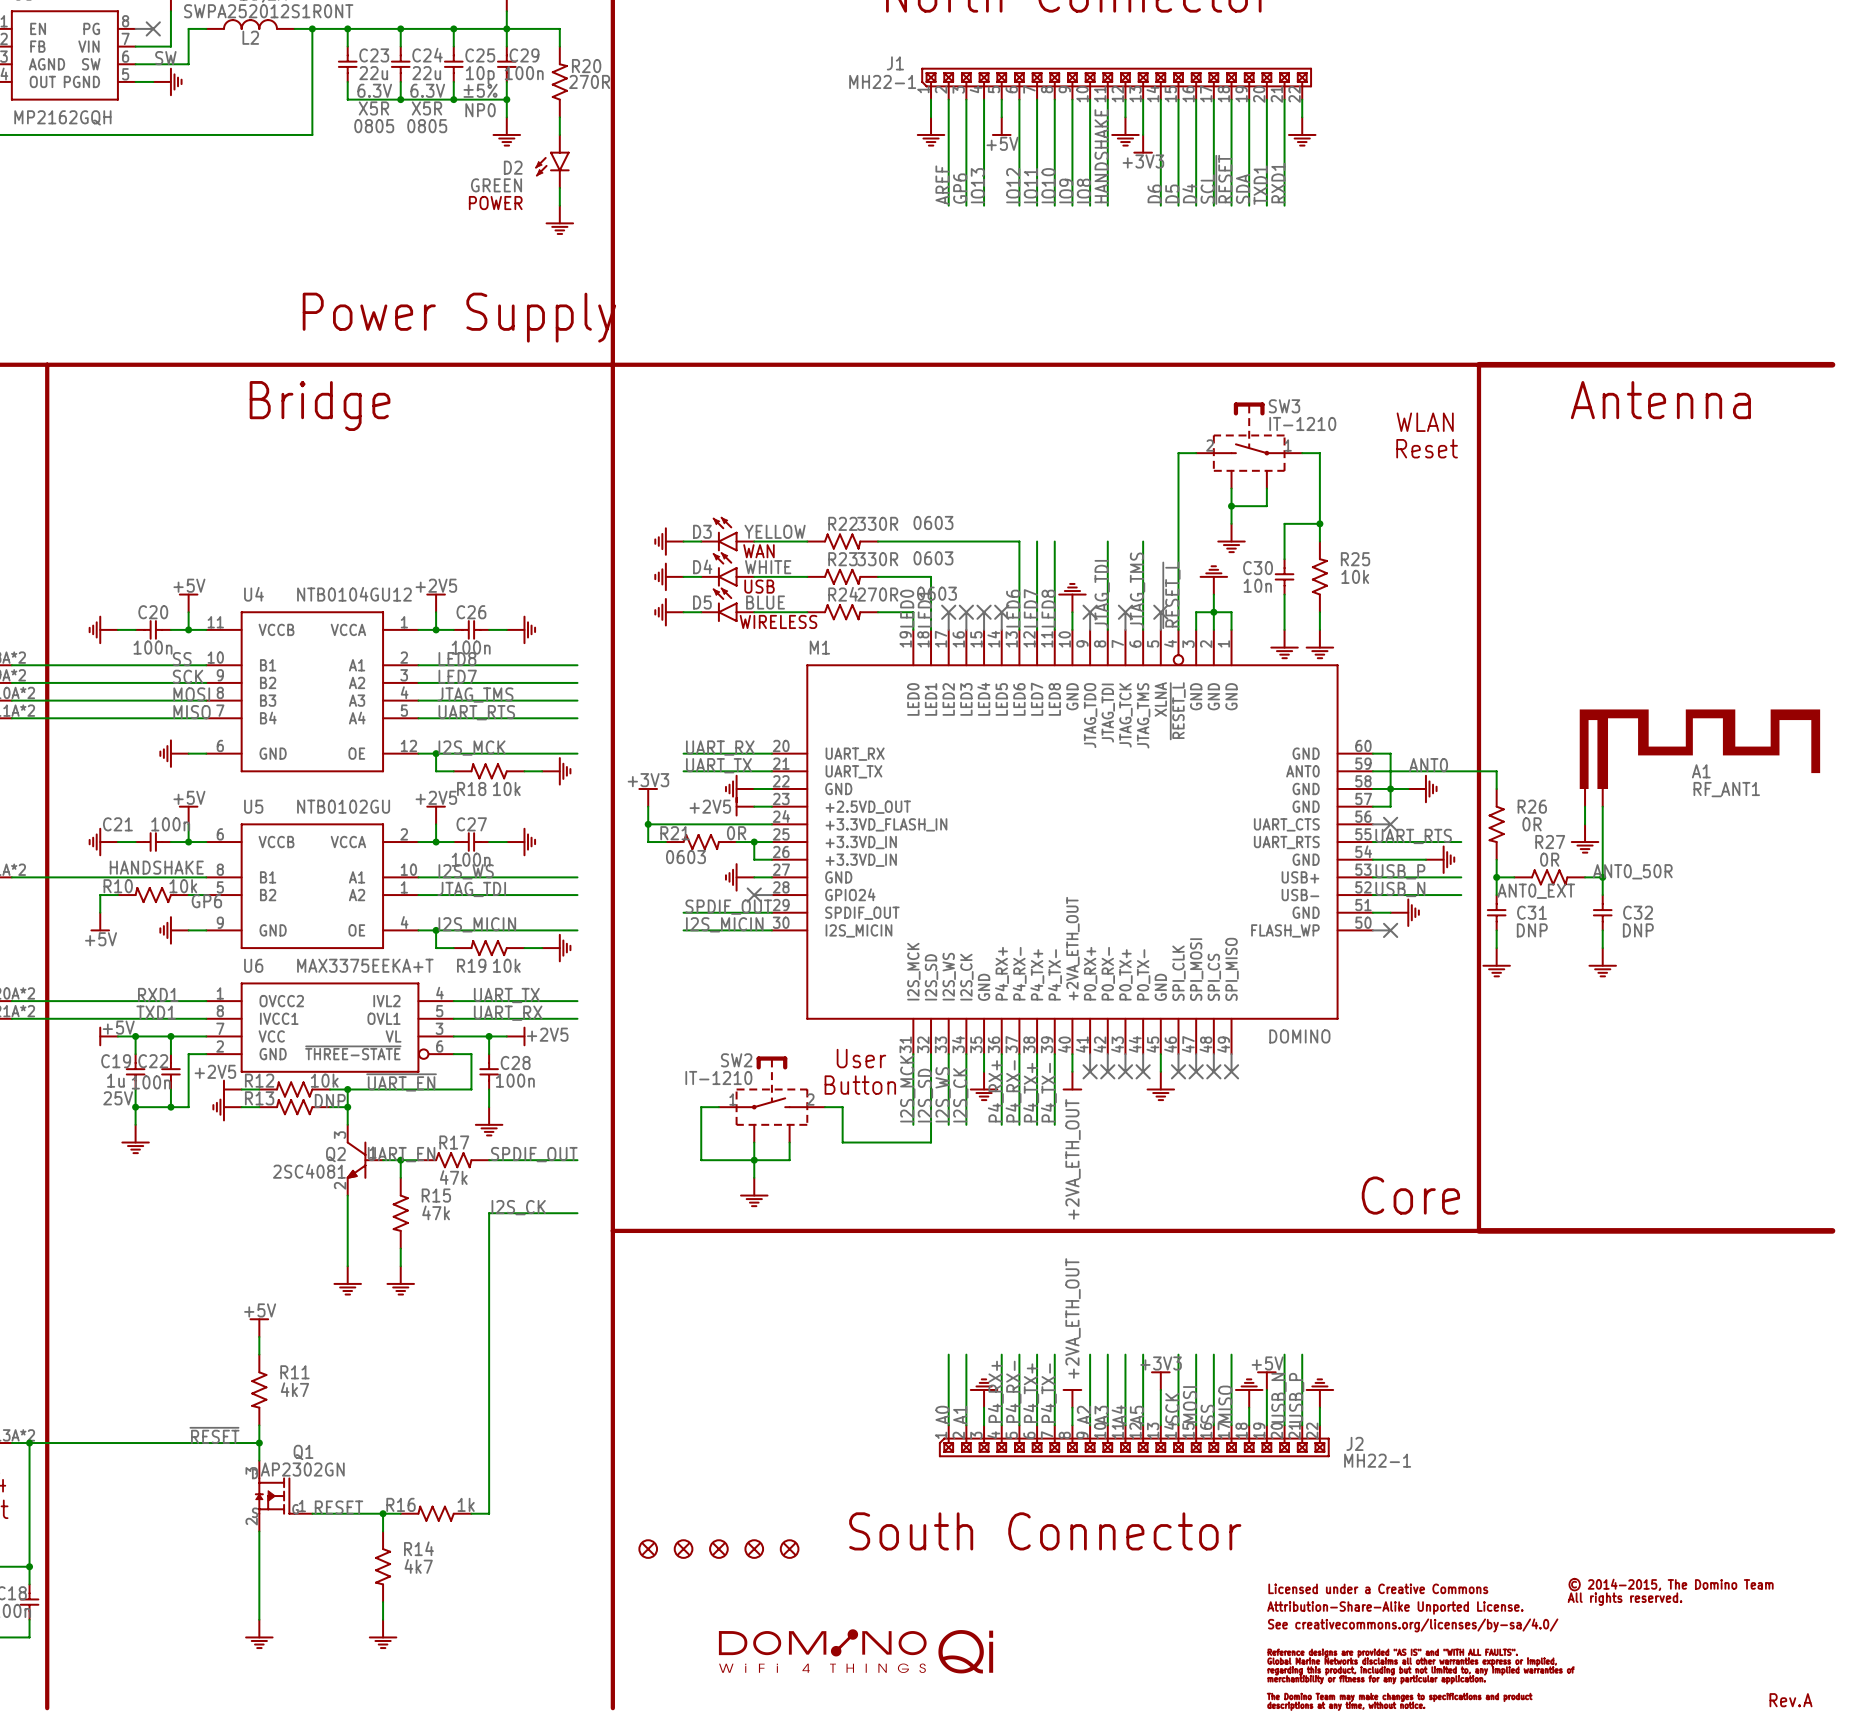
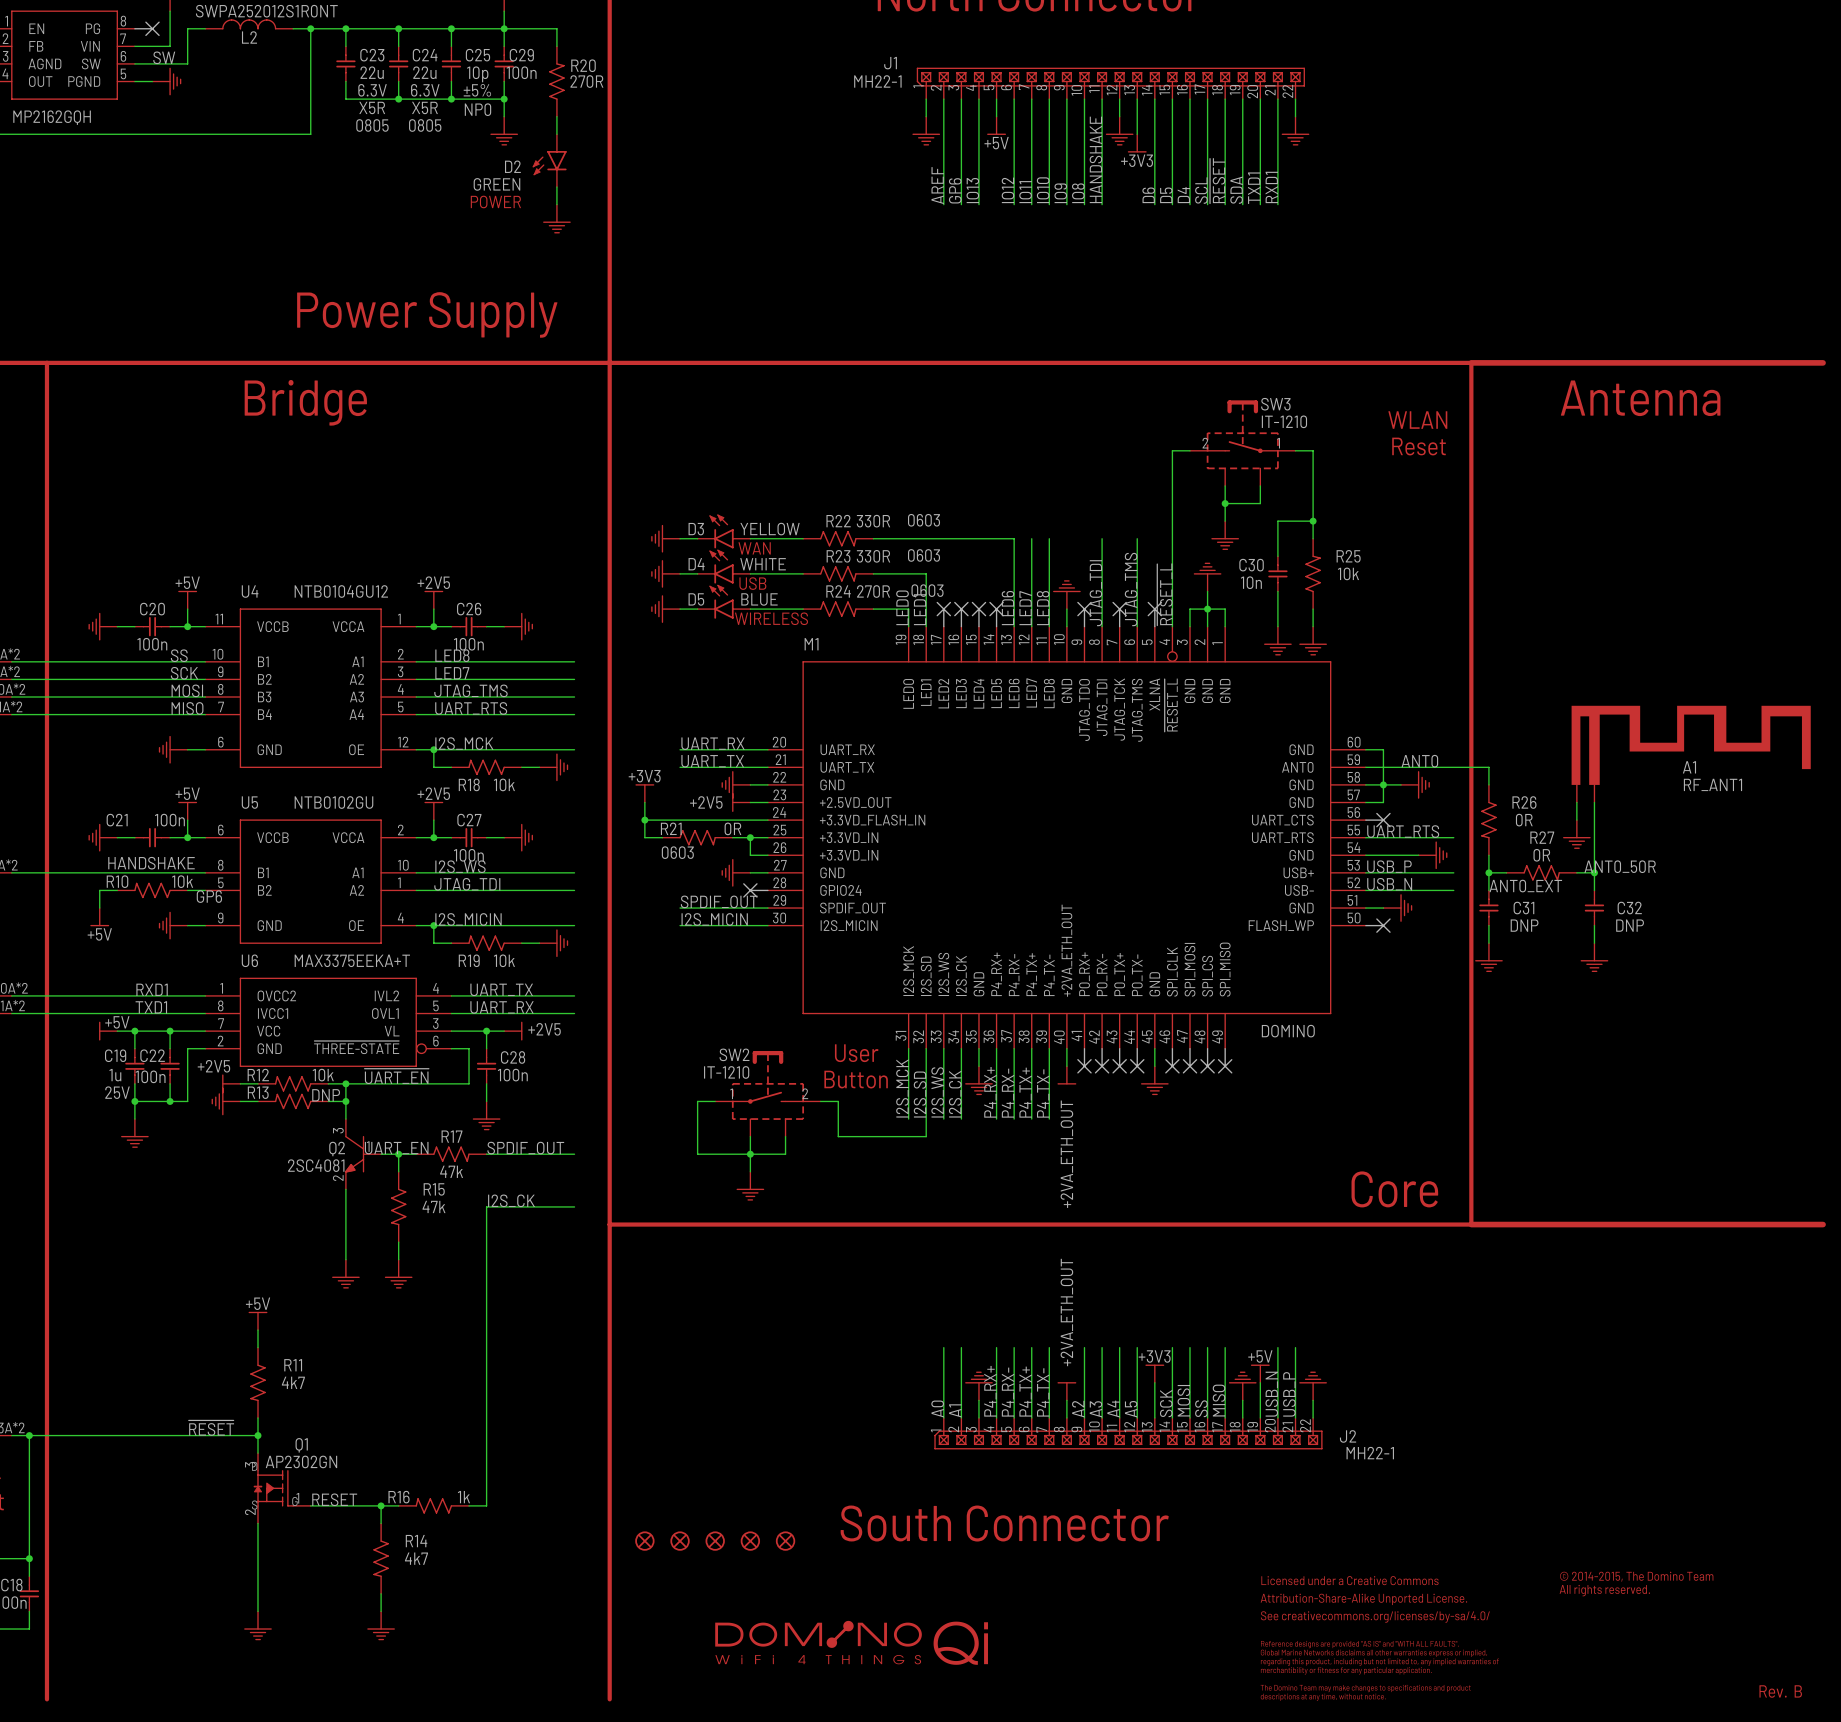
text: A (1807, 1700) -> B (1798, 1691)

